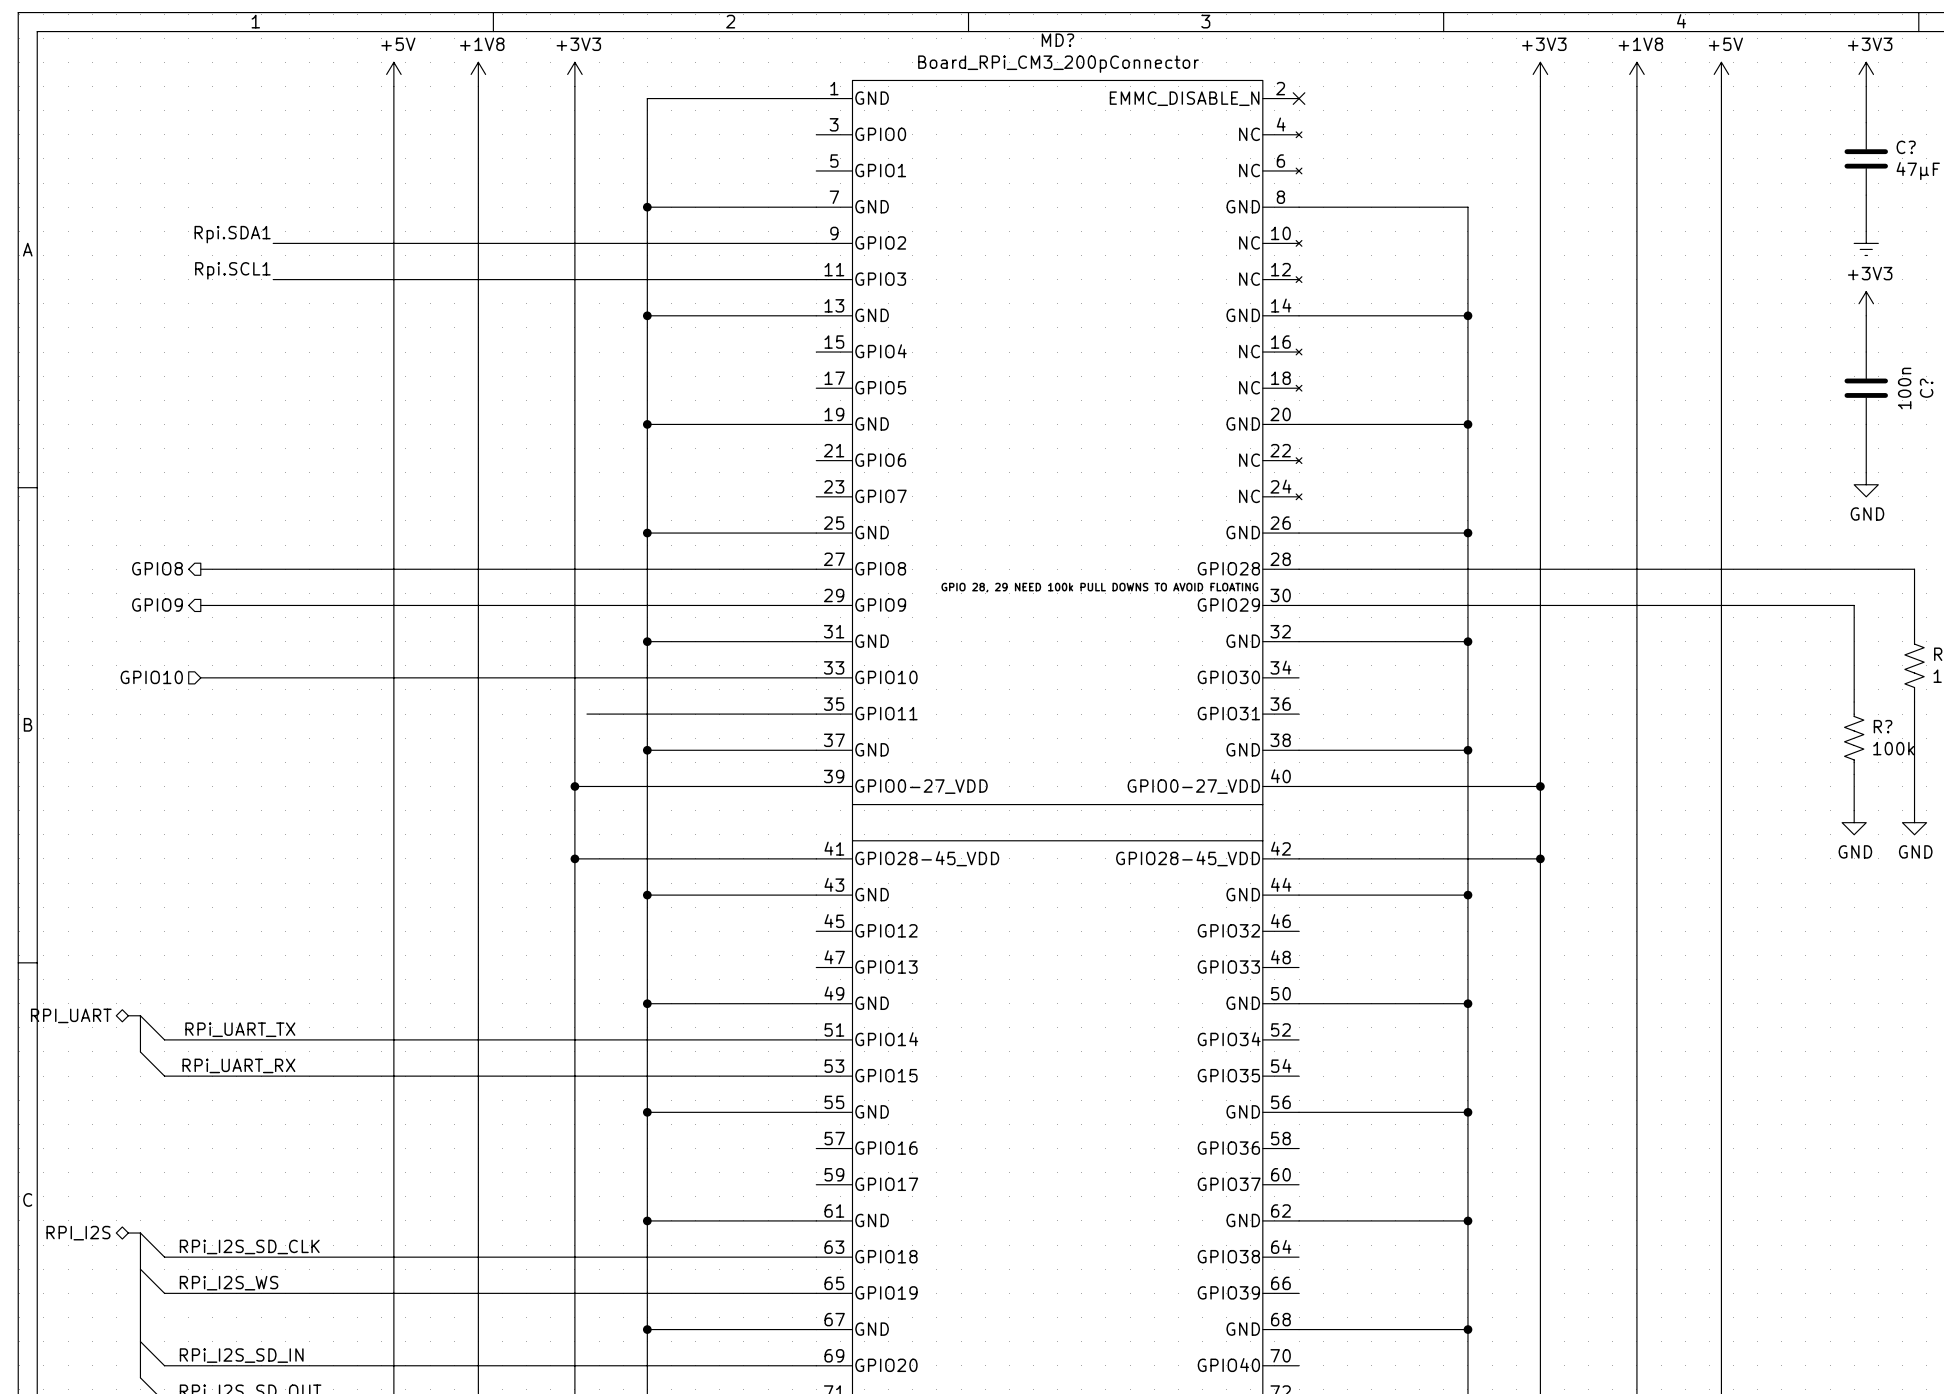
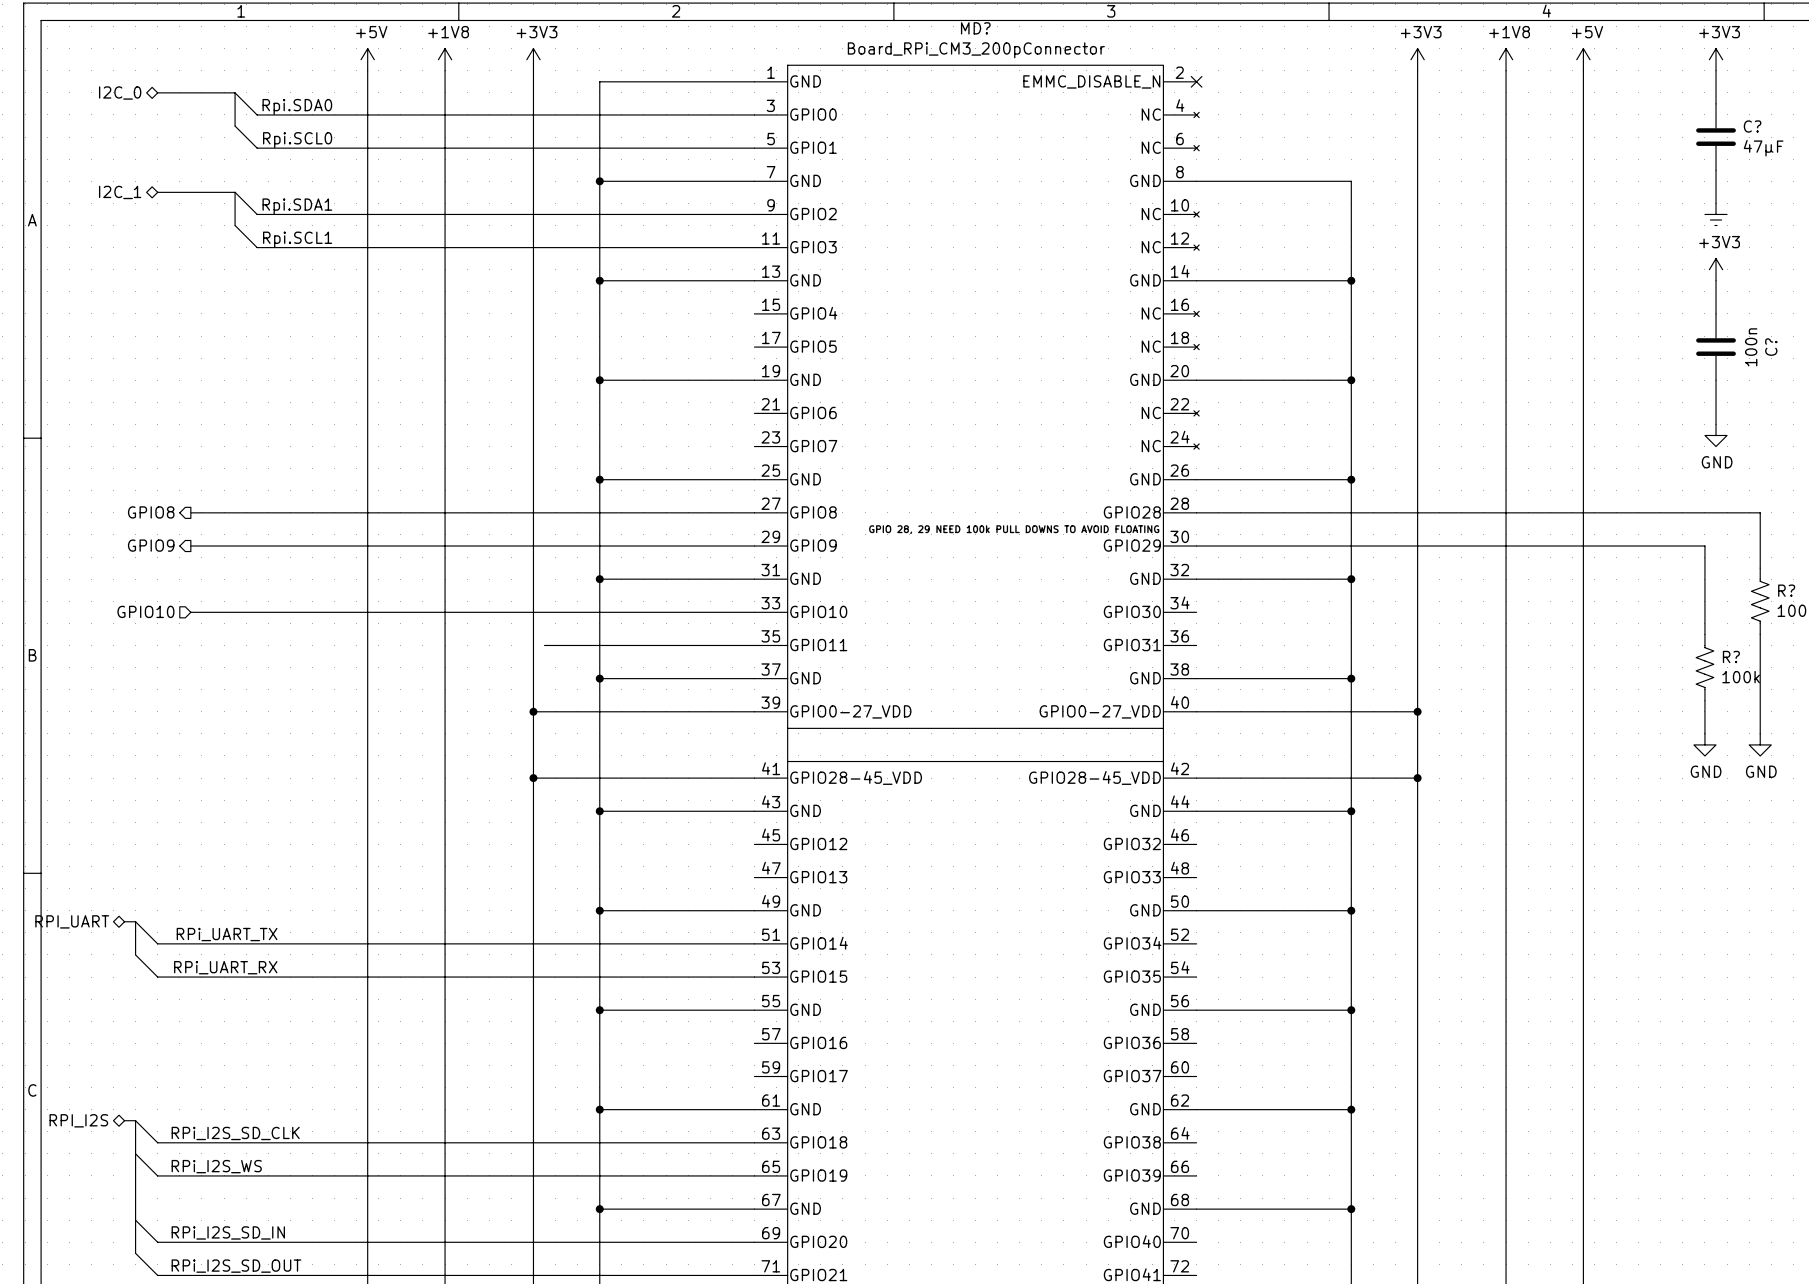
hierarchical label: none -> I2C_0 (120, 92)
bus: none -> (157, 92) (235, 92) (235, 126)
wire: none -> (235, 92) (257, 114) (754, 114)
label: none -> Rpi.SDA0 (297, 106)
wire: none -> (235, 126) (257, 148) (754, 148)
label: none -> Rpi.SCL0 (297, 140)
hierarchical label: none -> I2C_1 (120, 192)
bus: none -> (157, 192) (235, 192) (235, 225)
wire: none -> (235, 192) (257, 214)
label position: Rpi.SDA1 (232, 234) -> Rpi.SDA1 (297, 206)
wire: none -> (235, 225) (257, 247)
label position: Rpi.SCL1 (232, 270) -> Rpi.SCL1 (297, 239)

